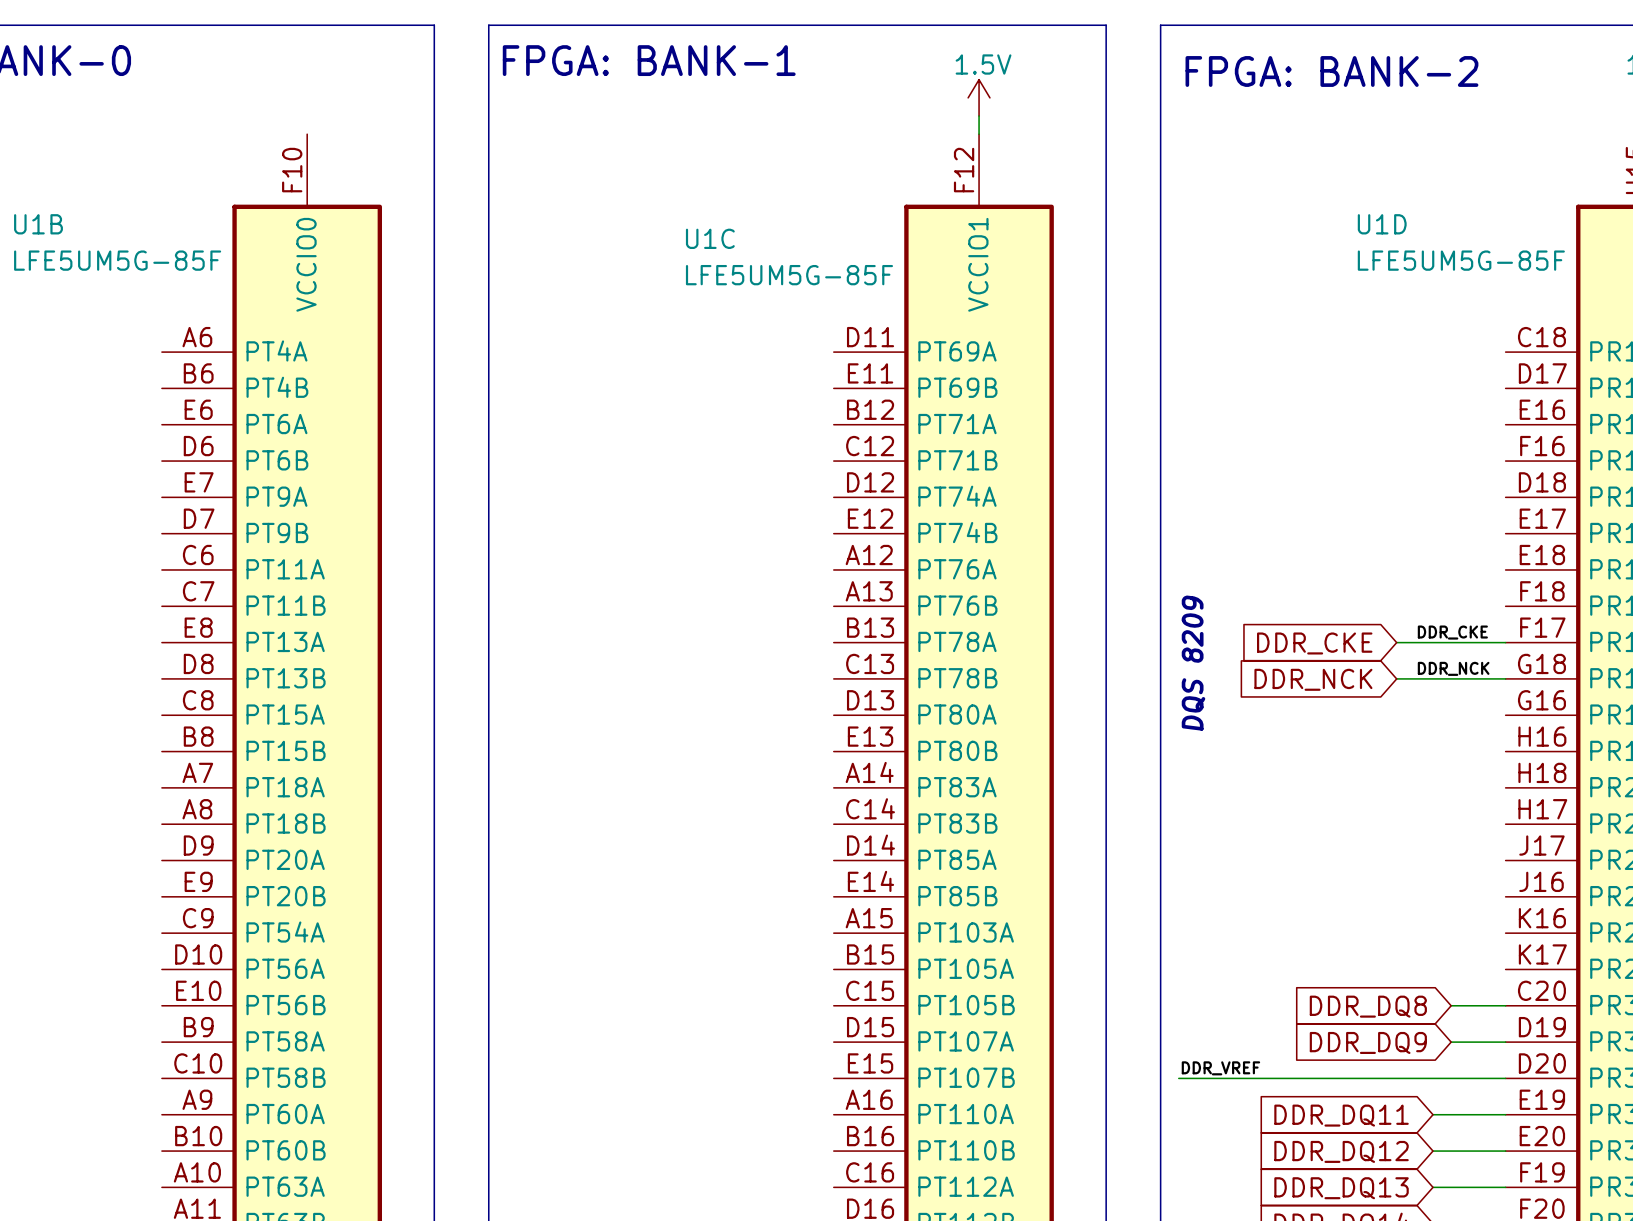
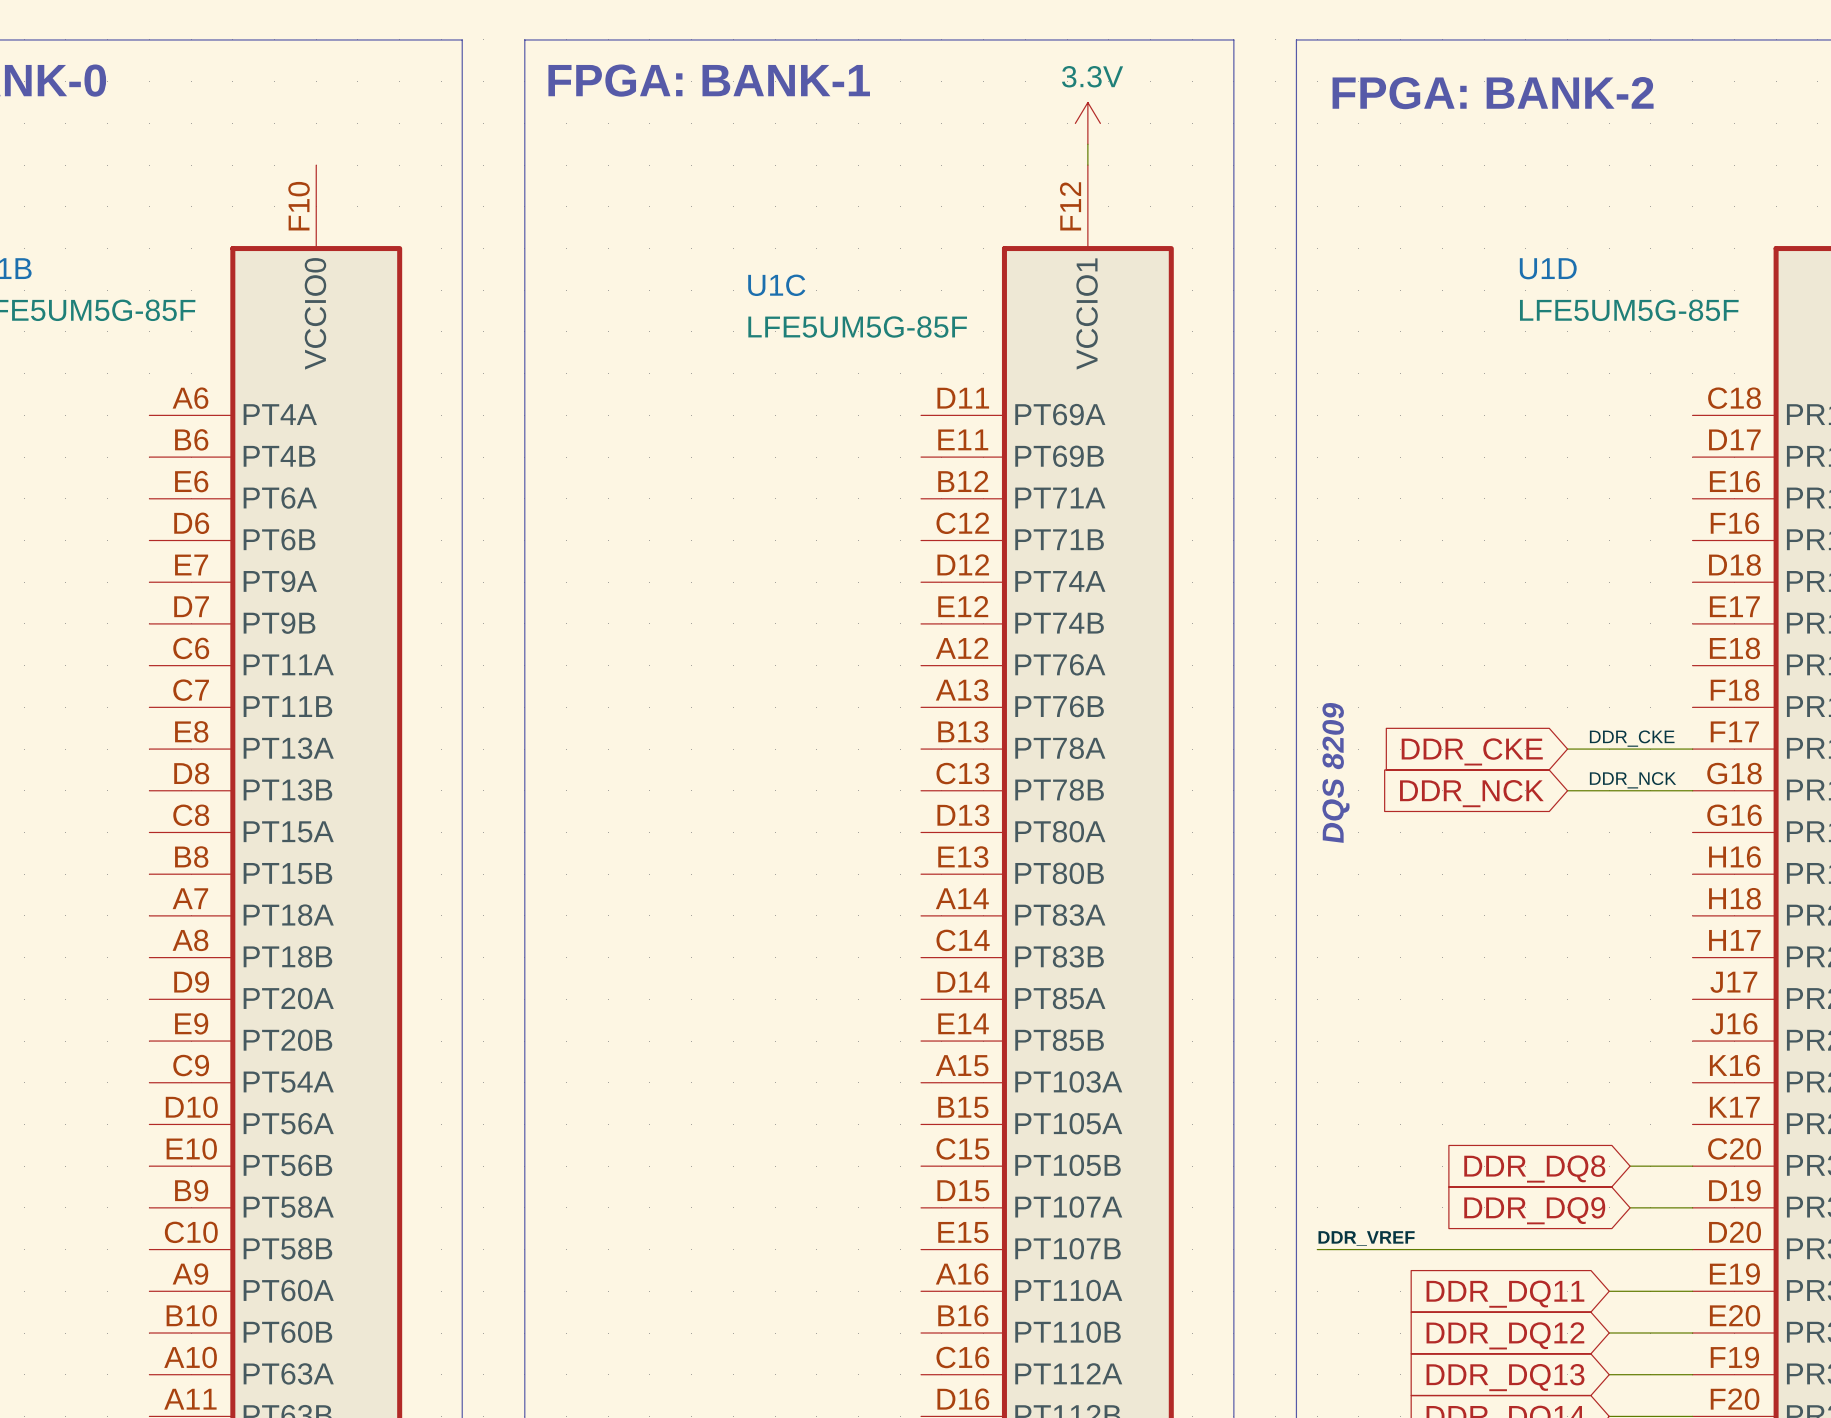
power symbol: 1.5V (979, 97) -> 3.3V (1087, 123)

